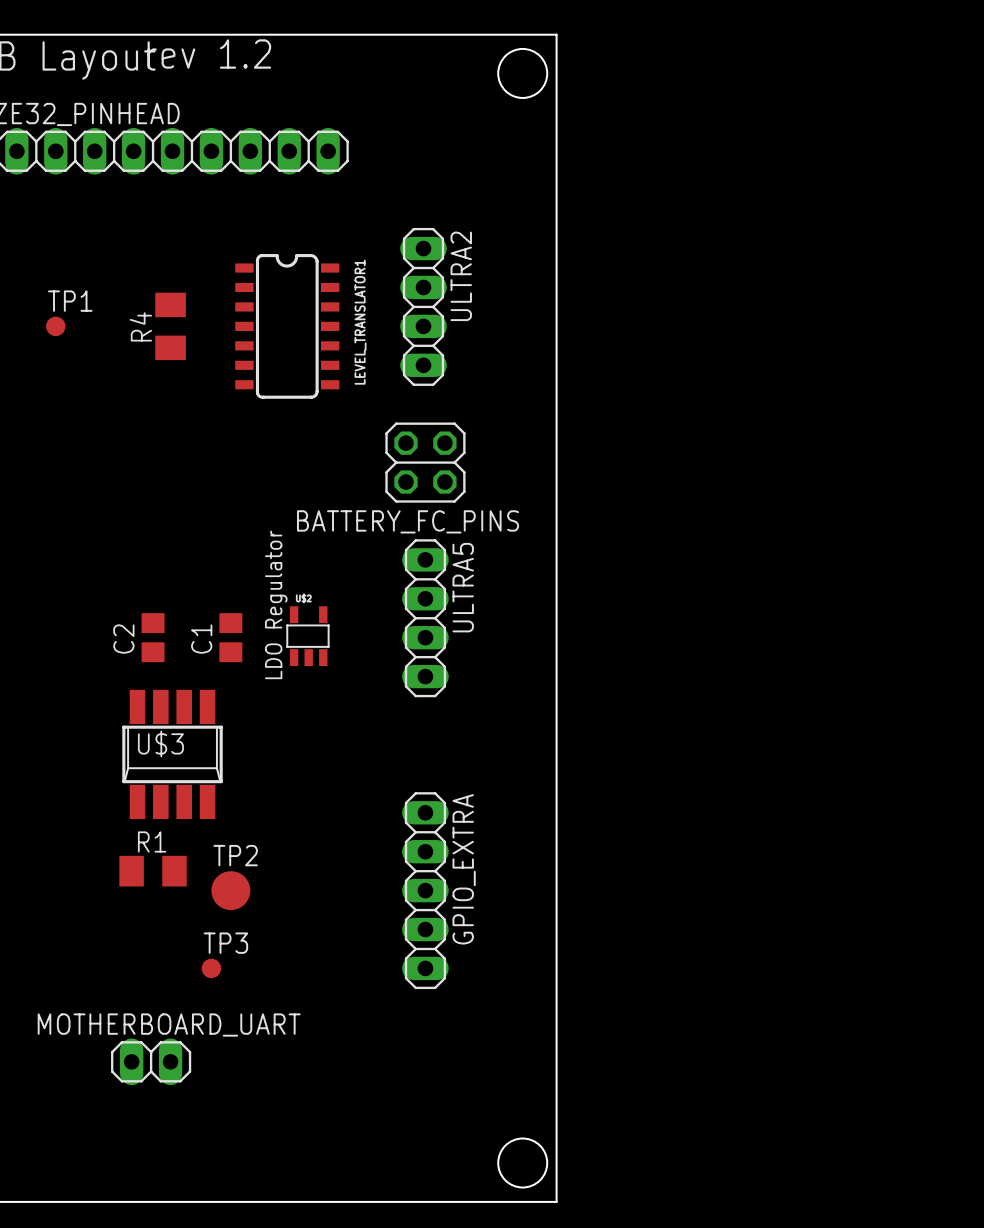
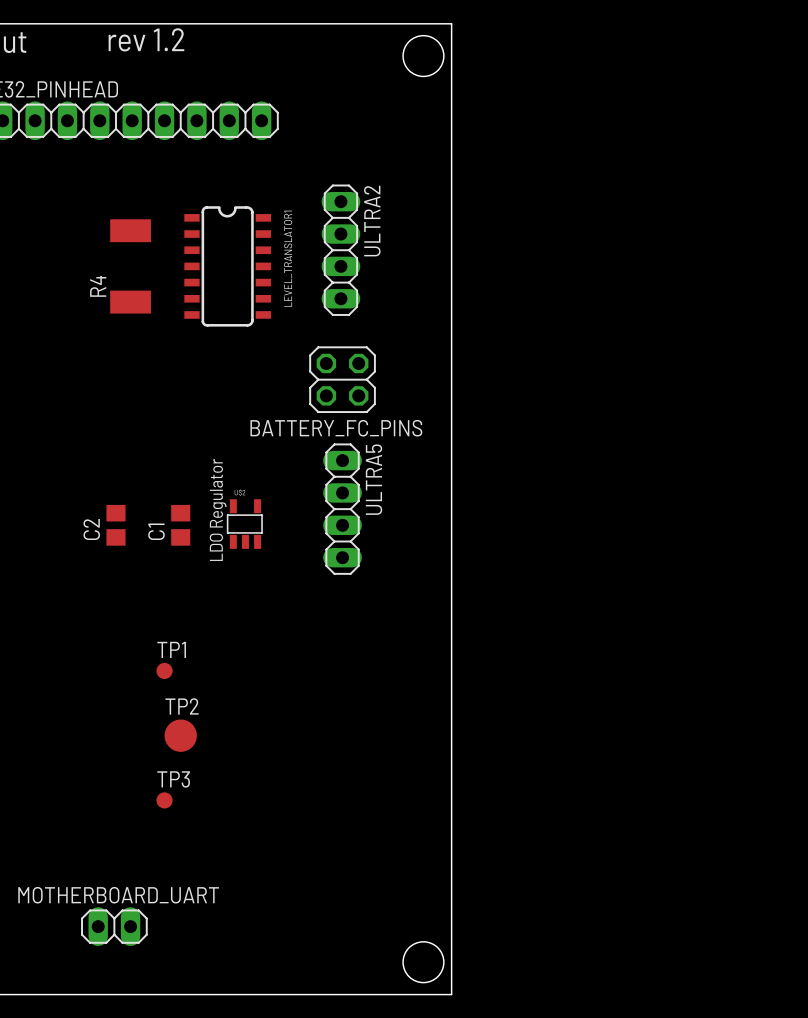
R4 footprint: [155, 292, 186, 361] -> [110, 219, 151, 314]
TP1 position: (55, 326) -> (164, 670)
U$3: (172, 754) -> none
R1: (153, 871) -> none
GPIO_EXTRA: (425, 890) -> none
MOTHERBOARD_UART position: (151, 1061) -> (114, 926)

